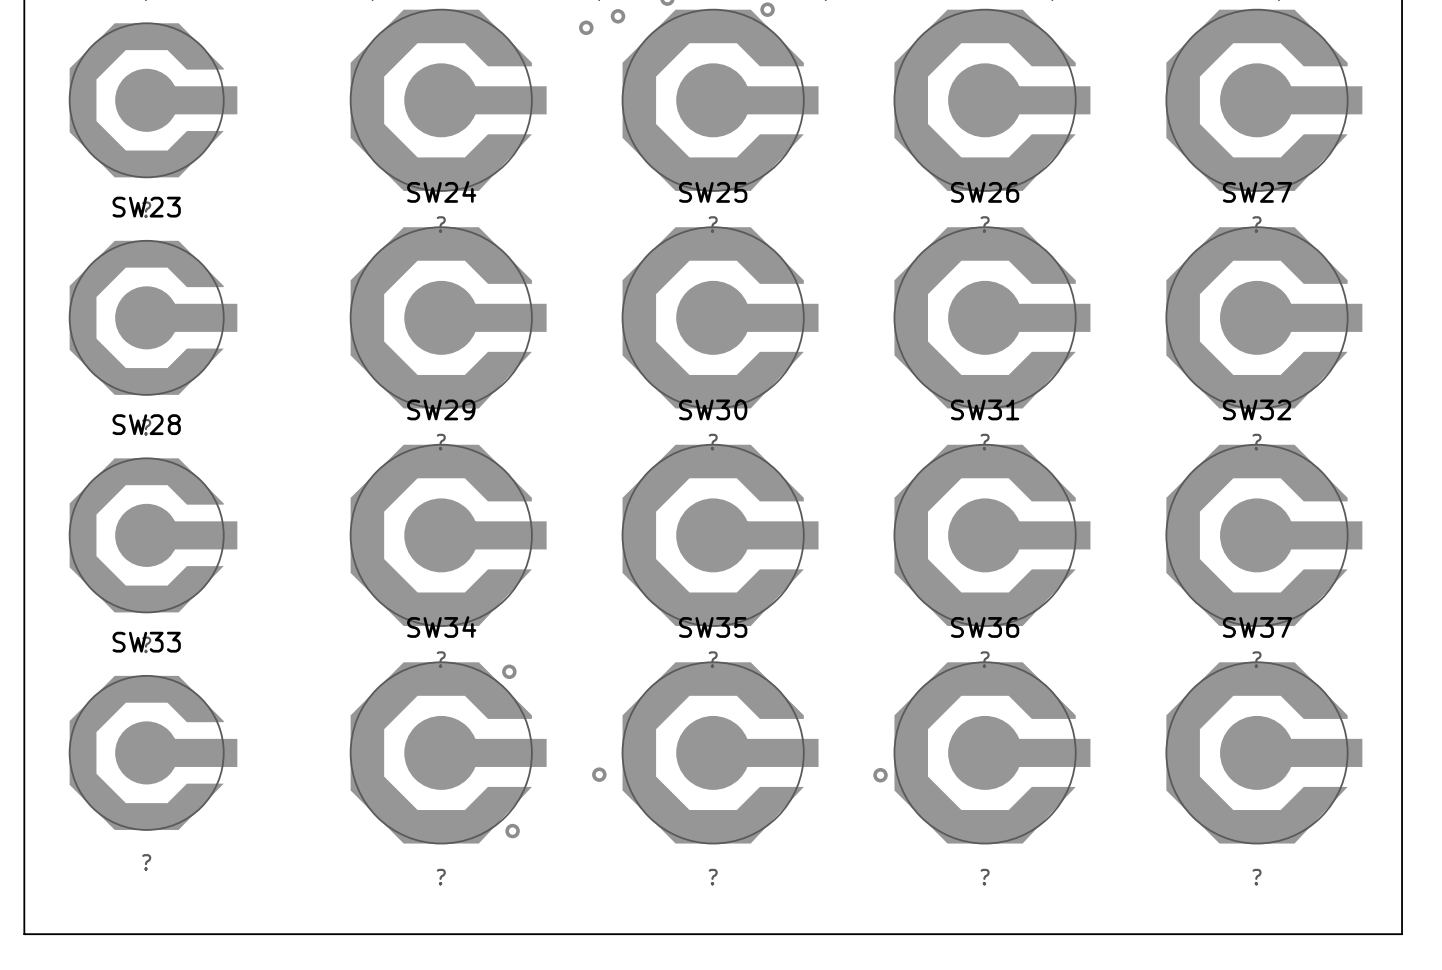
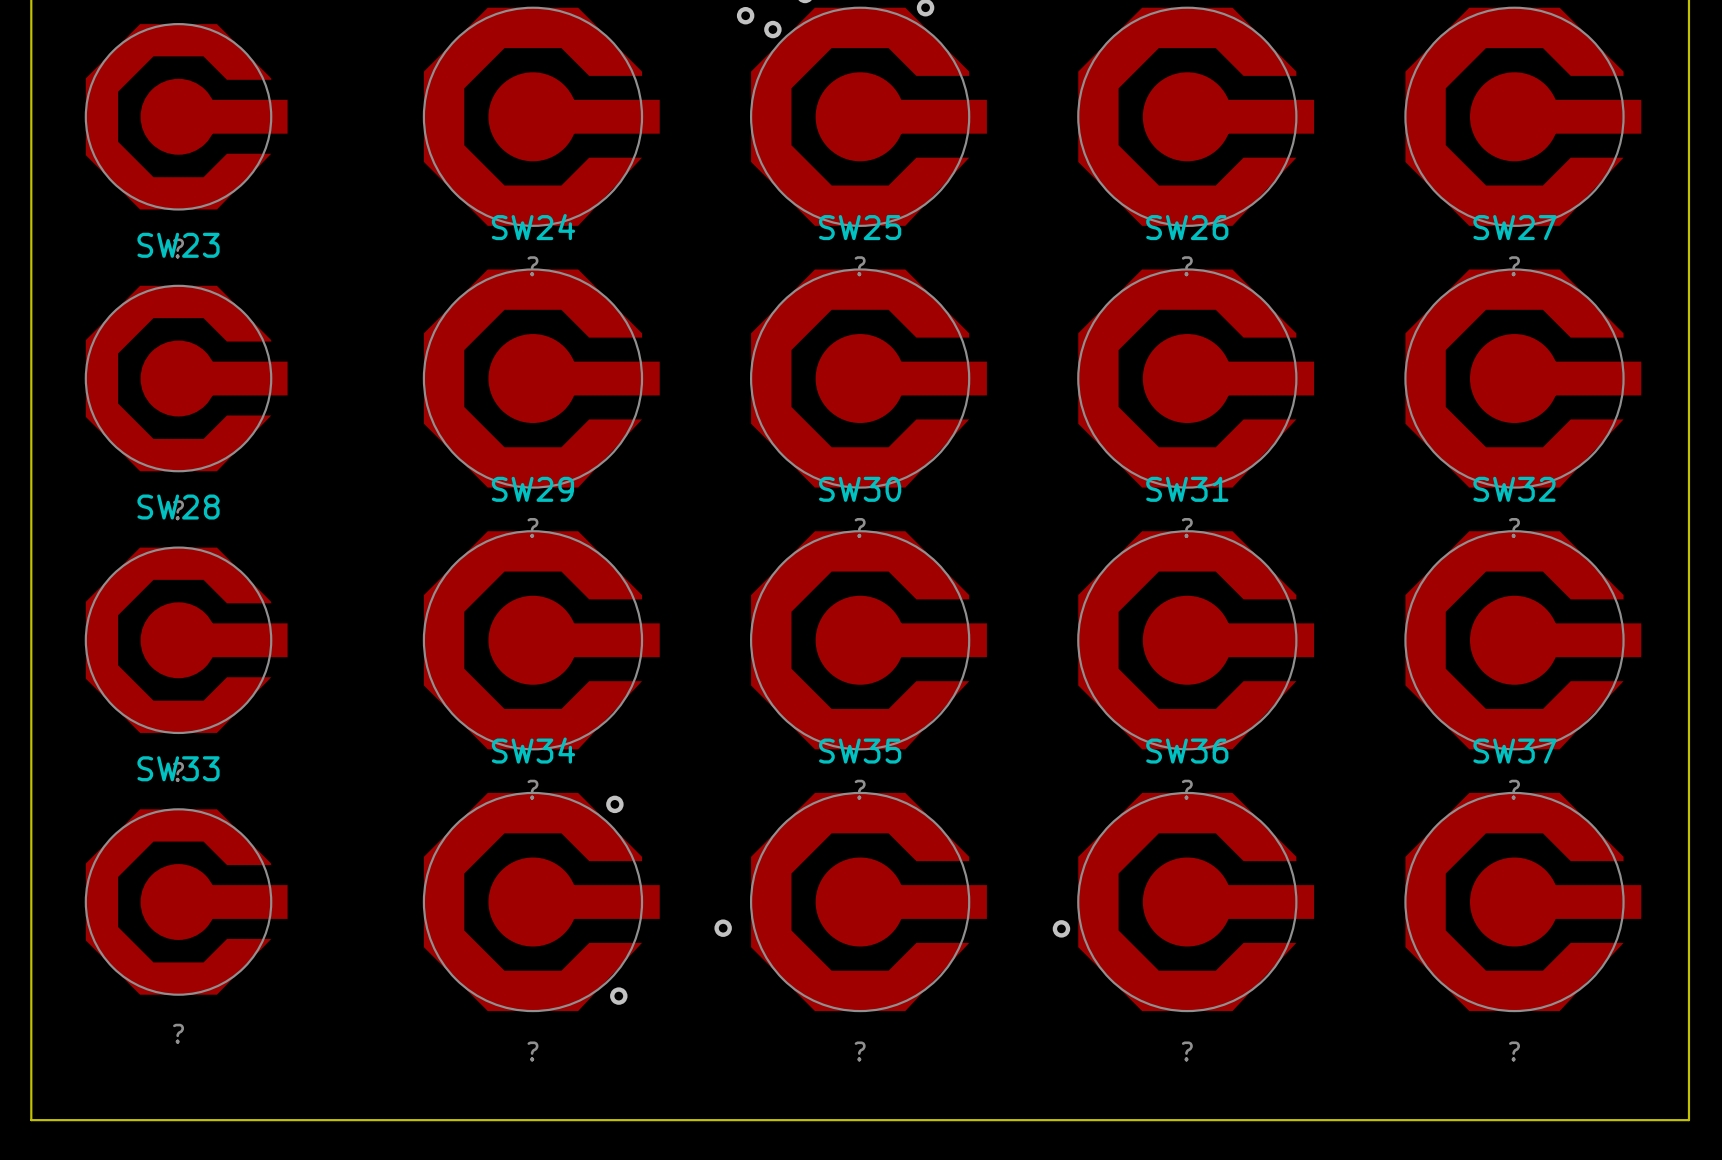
via position: (586, 27) -> (772, 29)

